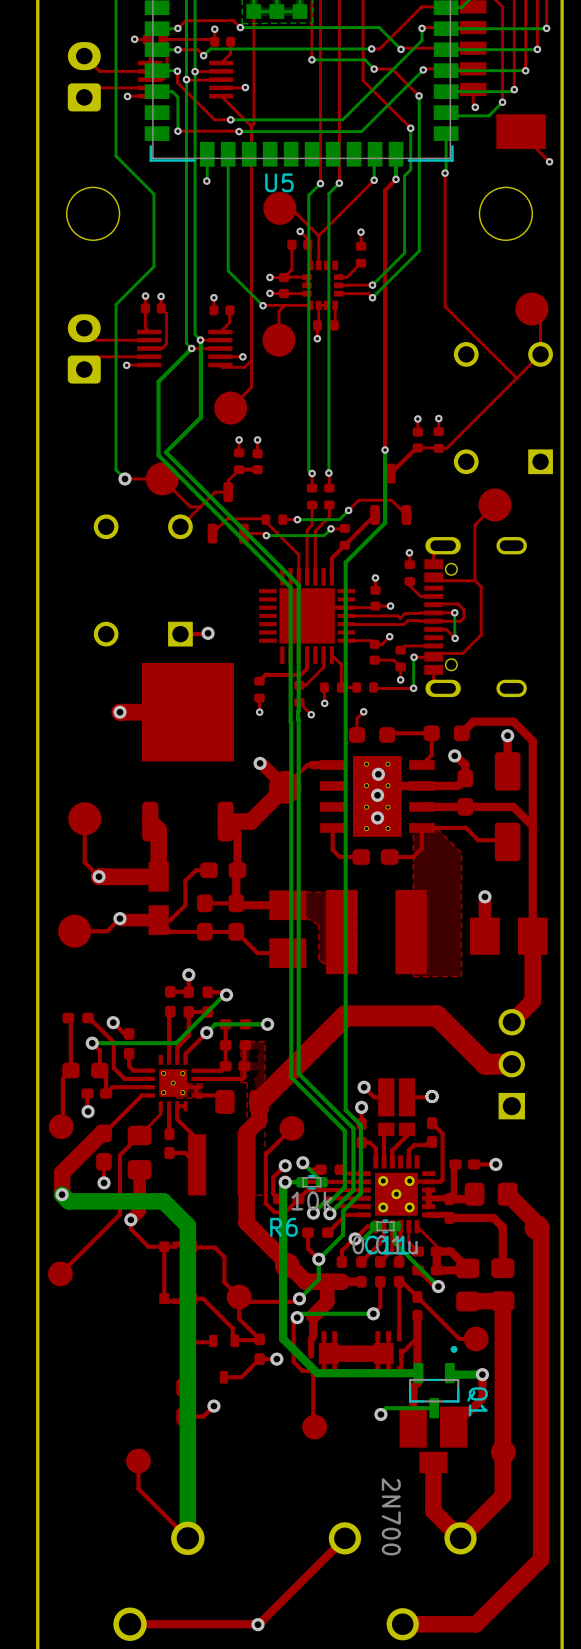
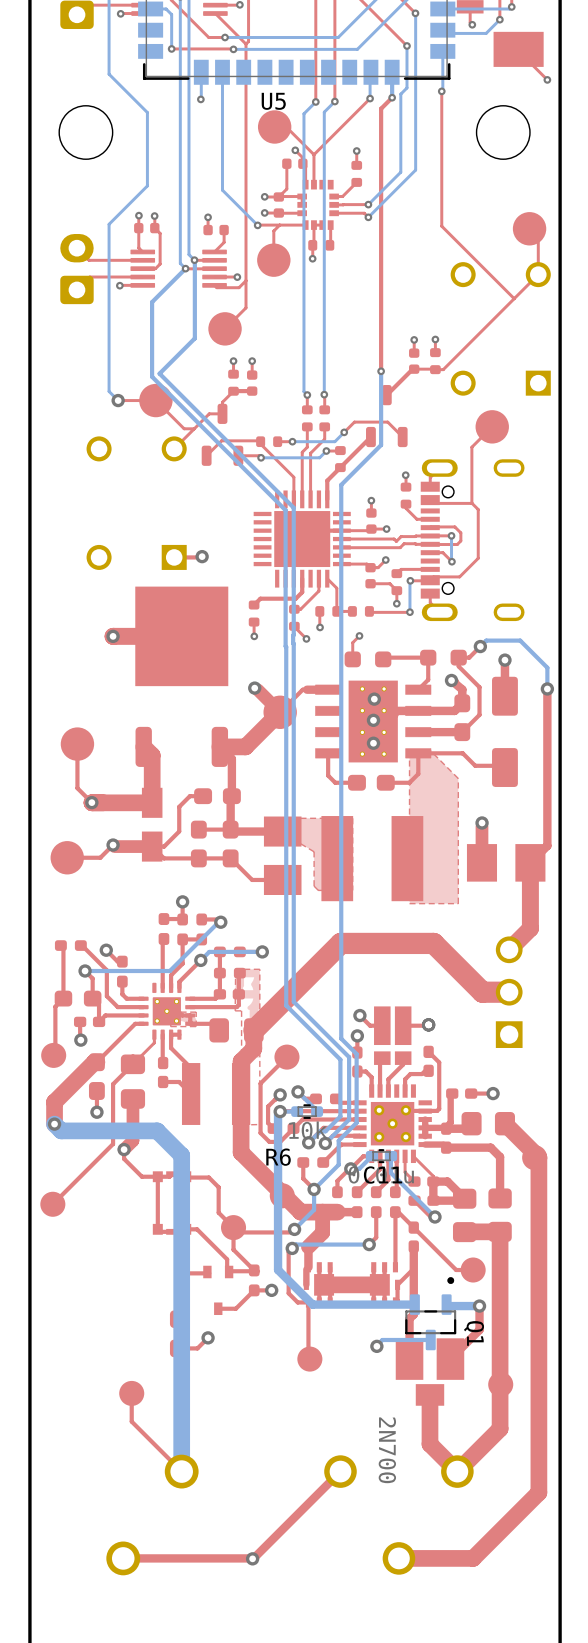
bottom track: none -> (480, 646) (486, 640) (520, 640) (547, 667) (547, 688)
via: none -> (480, 646)
top track: (461, 733) (473, 721) (513, 721) (532, 741) (532, 936) -> (547, 688) (547, 845) (530, 862)
via: none -> (547, 688)
top track: (465, 806) (513, 806) (532, 826) -> (462, 732) (479, 714) (479, 687) (458, 666) (458, 657) (469, 657) (480, 646)

